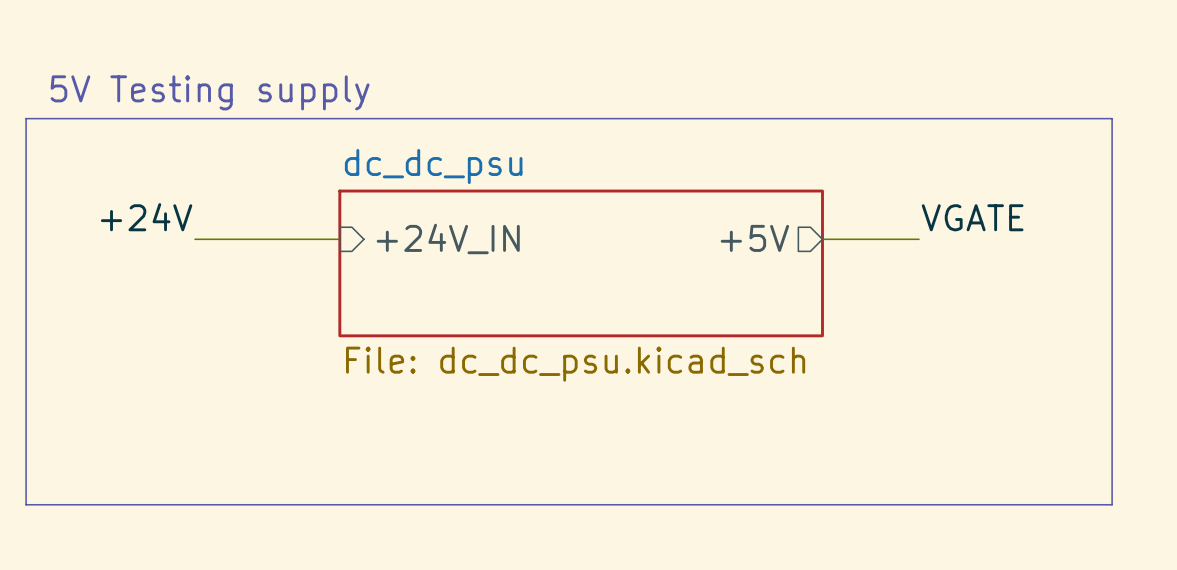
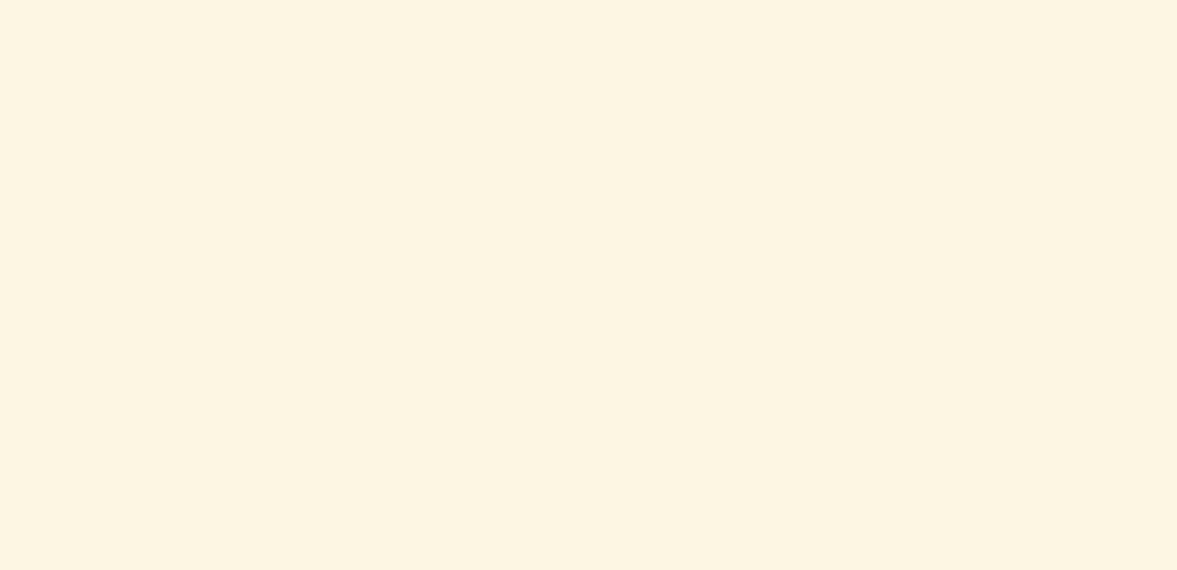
text: 5V Testing supply (210, 92) -> none
line: (26, 118) (1112, 118) (1112, 504) (26, 504) (26, 118) -> none
label: +24V (146, 217) -> none
label: VGATE (972, 217) -> none
sheet pin: +24V_IN (448, 238) -> none
sheet pin: +5V (754, 238) -> none
wire: (195, 239) (339, 239) -> none
wire: (822, 239) (919, 239) -> none
sheet dc_dc_psu: File: dc_dc_psu.kicad_sch (581, 263) -> none

